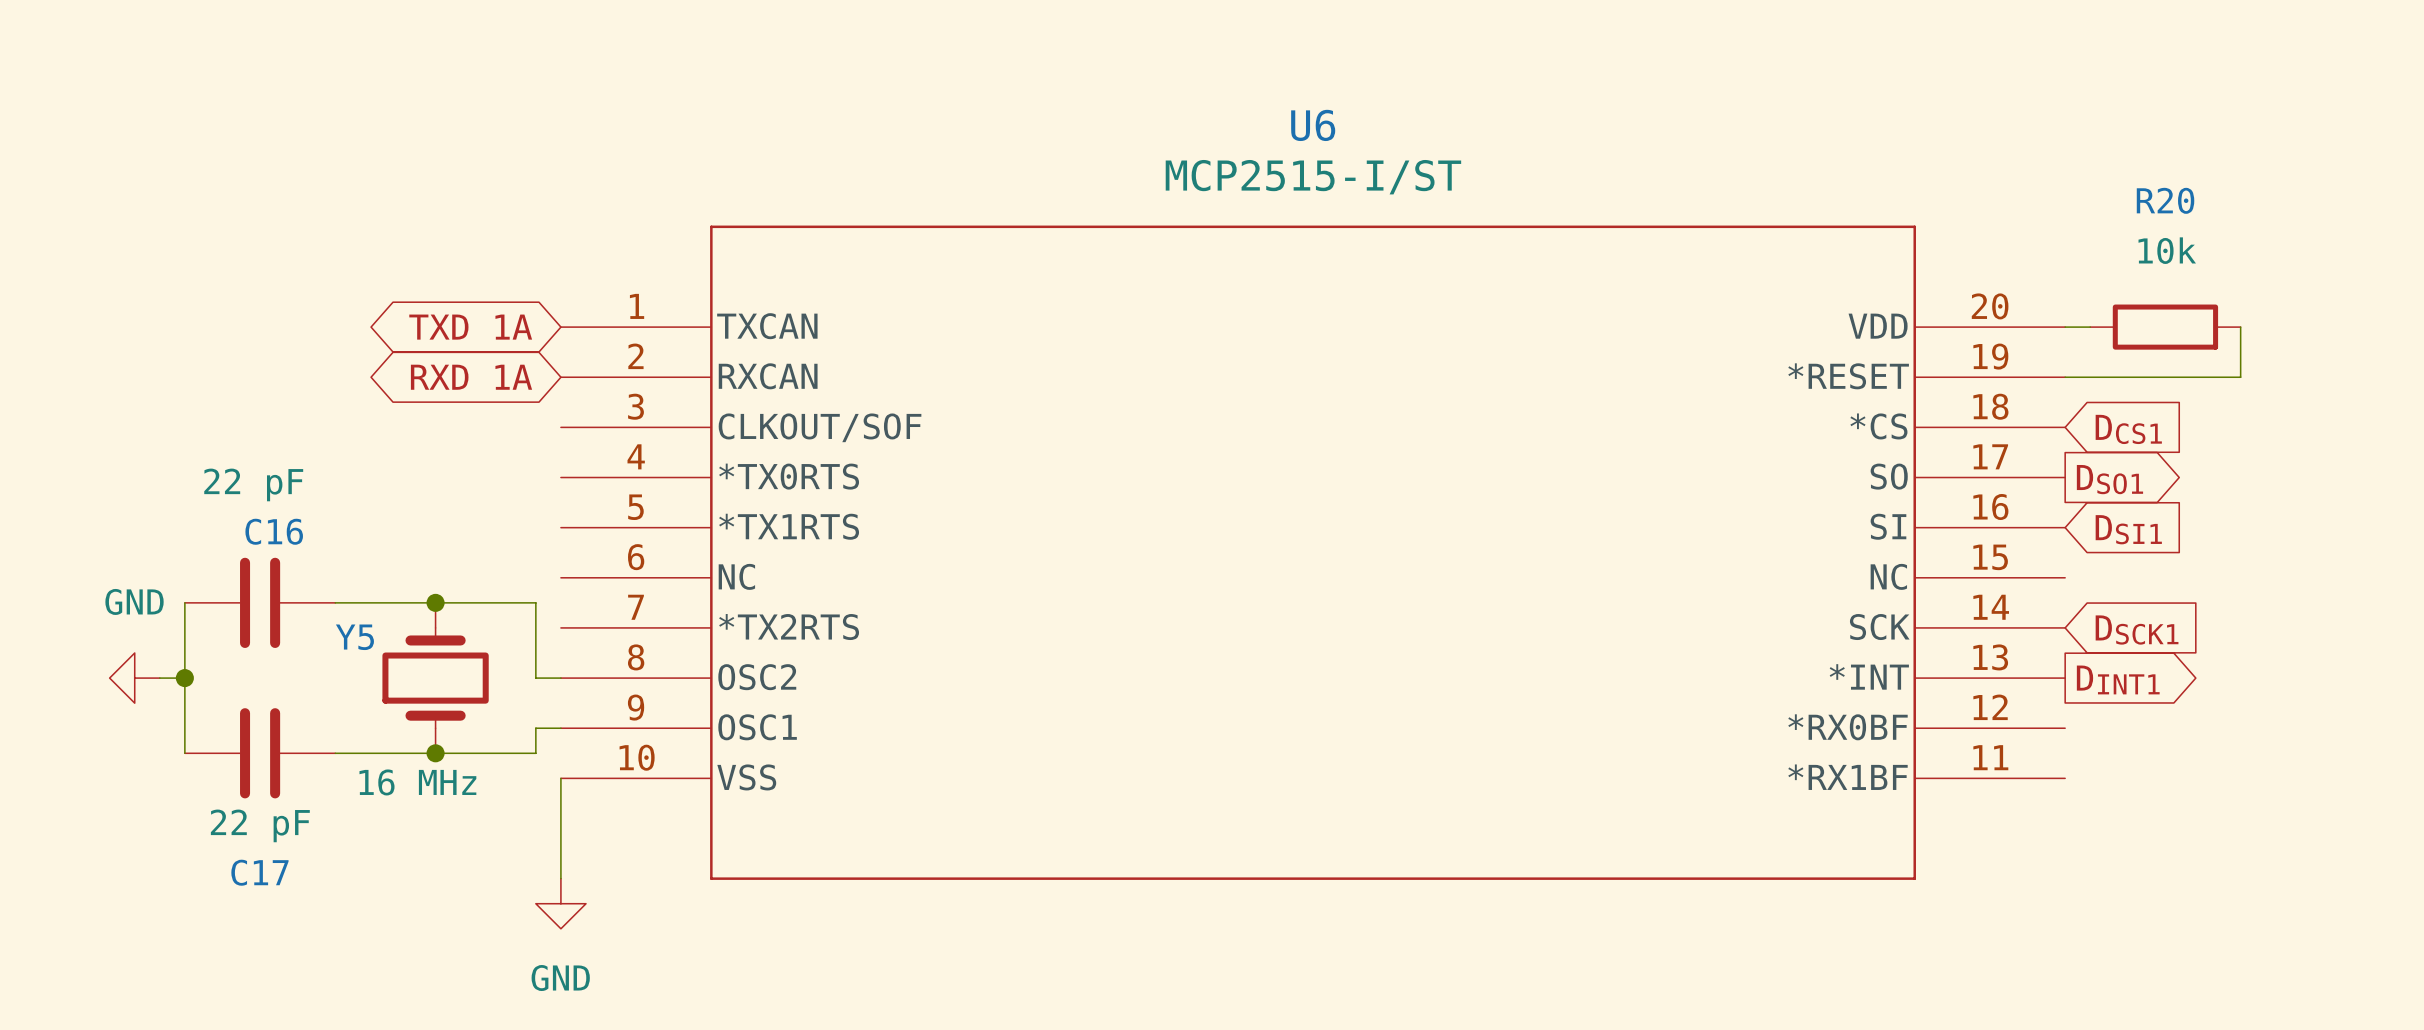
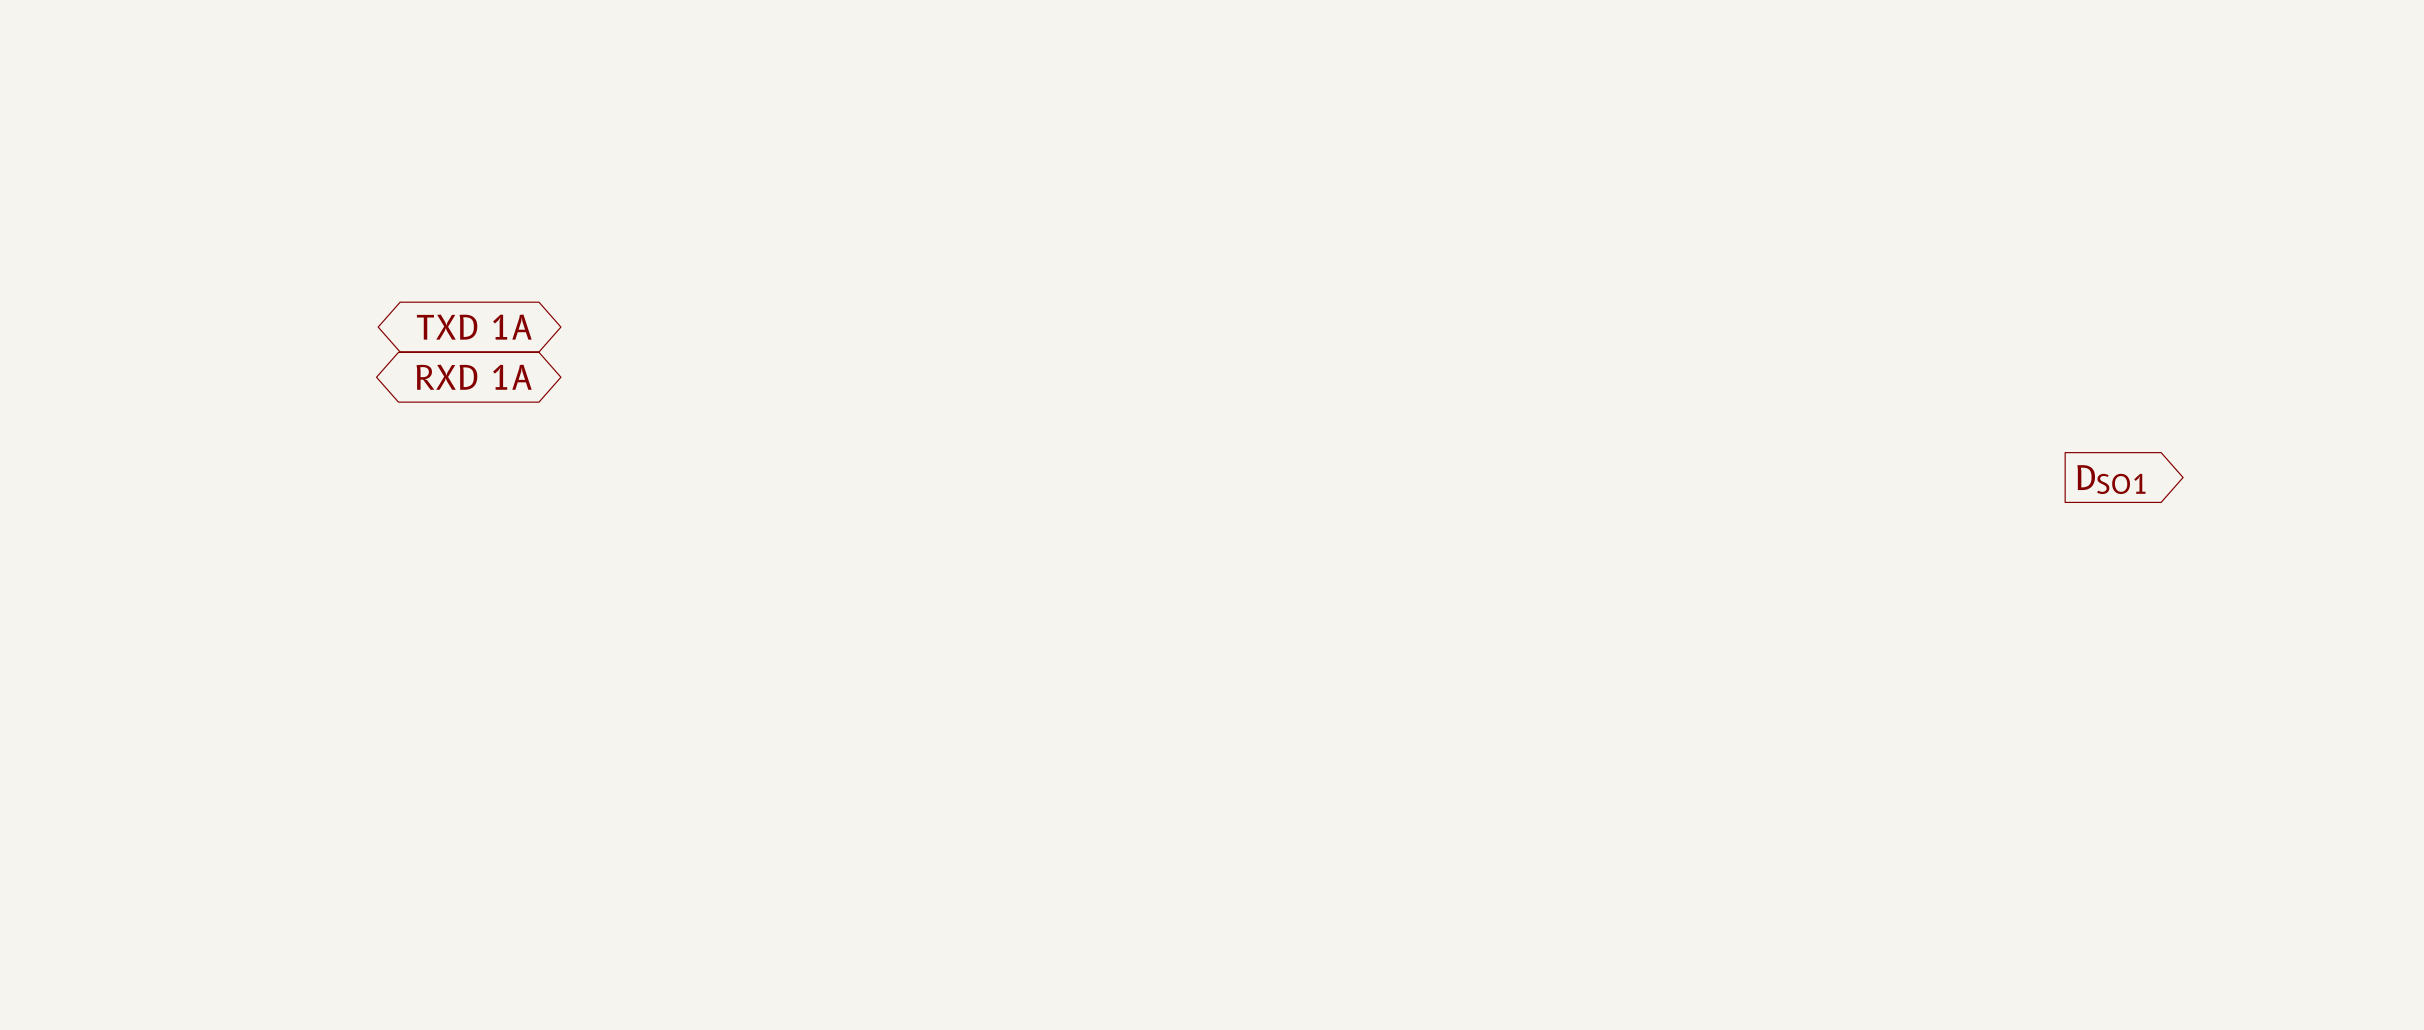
wire: (2065, 327) (2090, 327) -> none
R20: 10k (2165, 327) -> none
wire: (2240, 327) (2240, 377) (2065, 377) -> none
global label: DCS1 (2128, 429) -> none
global label: DSI1 (2128, 529) -> none
U6: MCP2515-I/ST (1313, 552) -> none
wire: (184, 602) (184, 753) -> none
C16: 22 pF (260, 602) -> none
wire: (335, 602) (535, 602) (535, 678) (560, 678) -> none
junction: (435, 602) -> none
global label: DSCK1 (2137, 630) -> none
power symbol: GND (134, 678) -> none
wire: (159, 678) (184, 678) -> none
junction: (184, 678) -> none
Y5: 16 MHz (435, 678) -> none
global label: DINT1 (2118, 679) -> none
wire: (560, 728) (535, 728) (535, 753) (335, 753) -> none
C17: 22 pF (260, 753) -> none
junction: (435, 753) -> none
wire: (560, 778) (560, 878) -> none
power symbol: GND (560, 903) -> none

